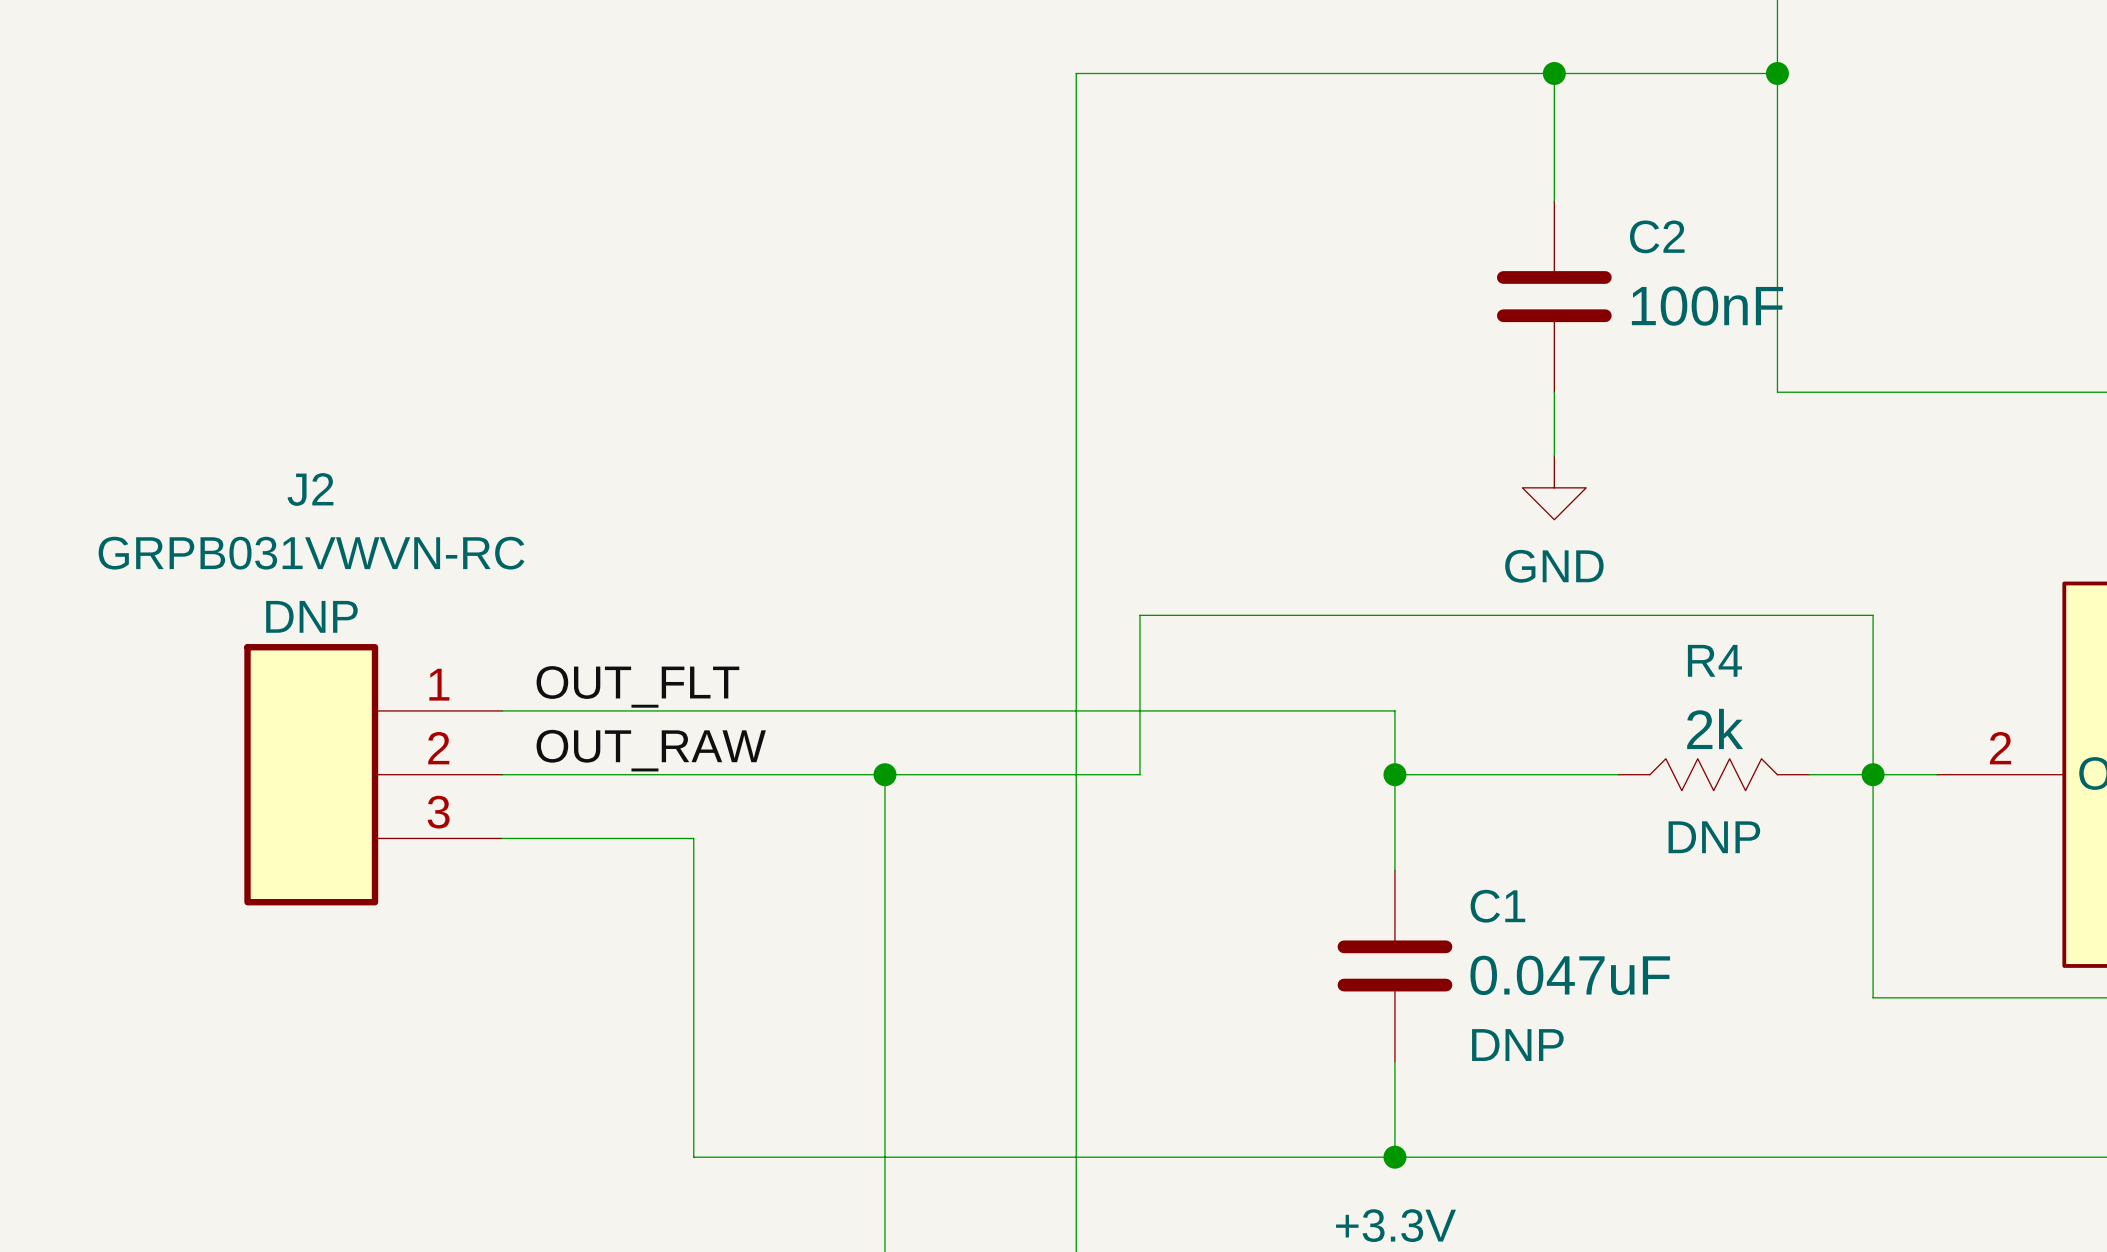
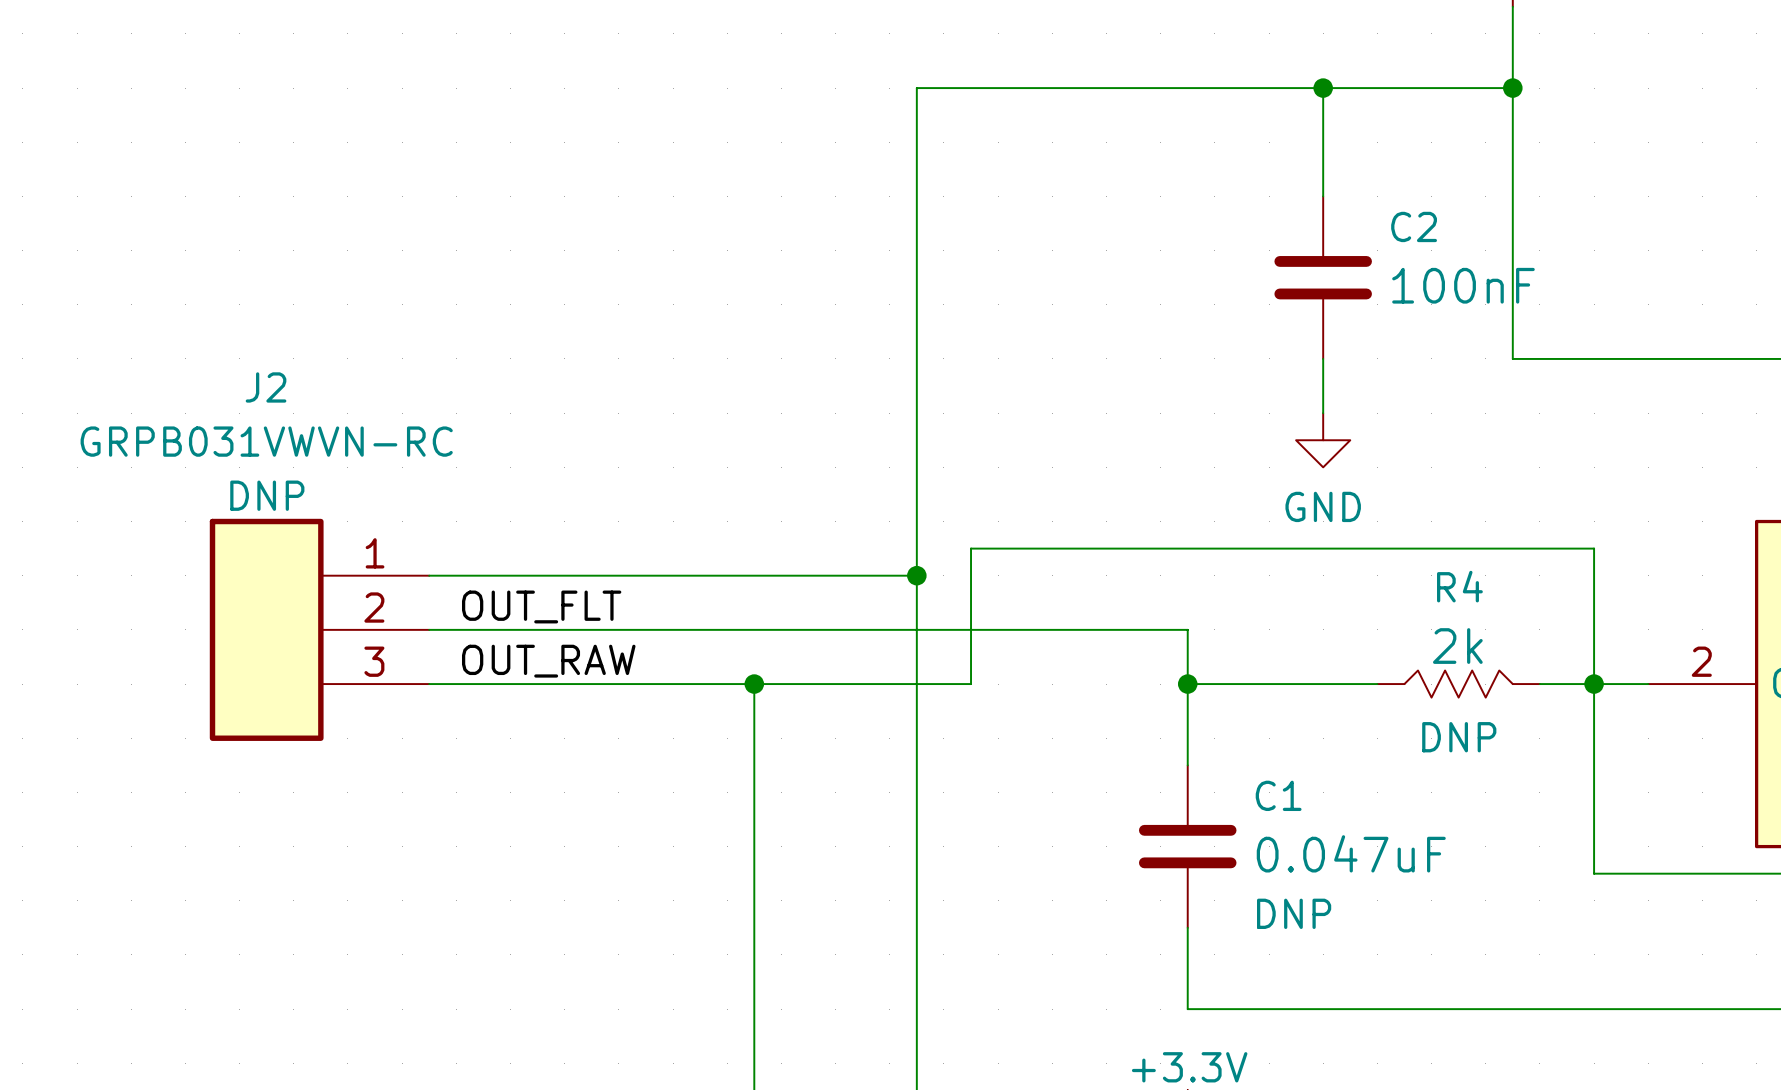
wire: none -> (429, 575) (916, 575)
junction: none -> (916, 575)
J2 position: (373, 774) -> (319, 629)
wire: (502, 838) (693, 838) (693, 1157) (1394, 1157) -> none
junction: (1394, 1157) -> none

